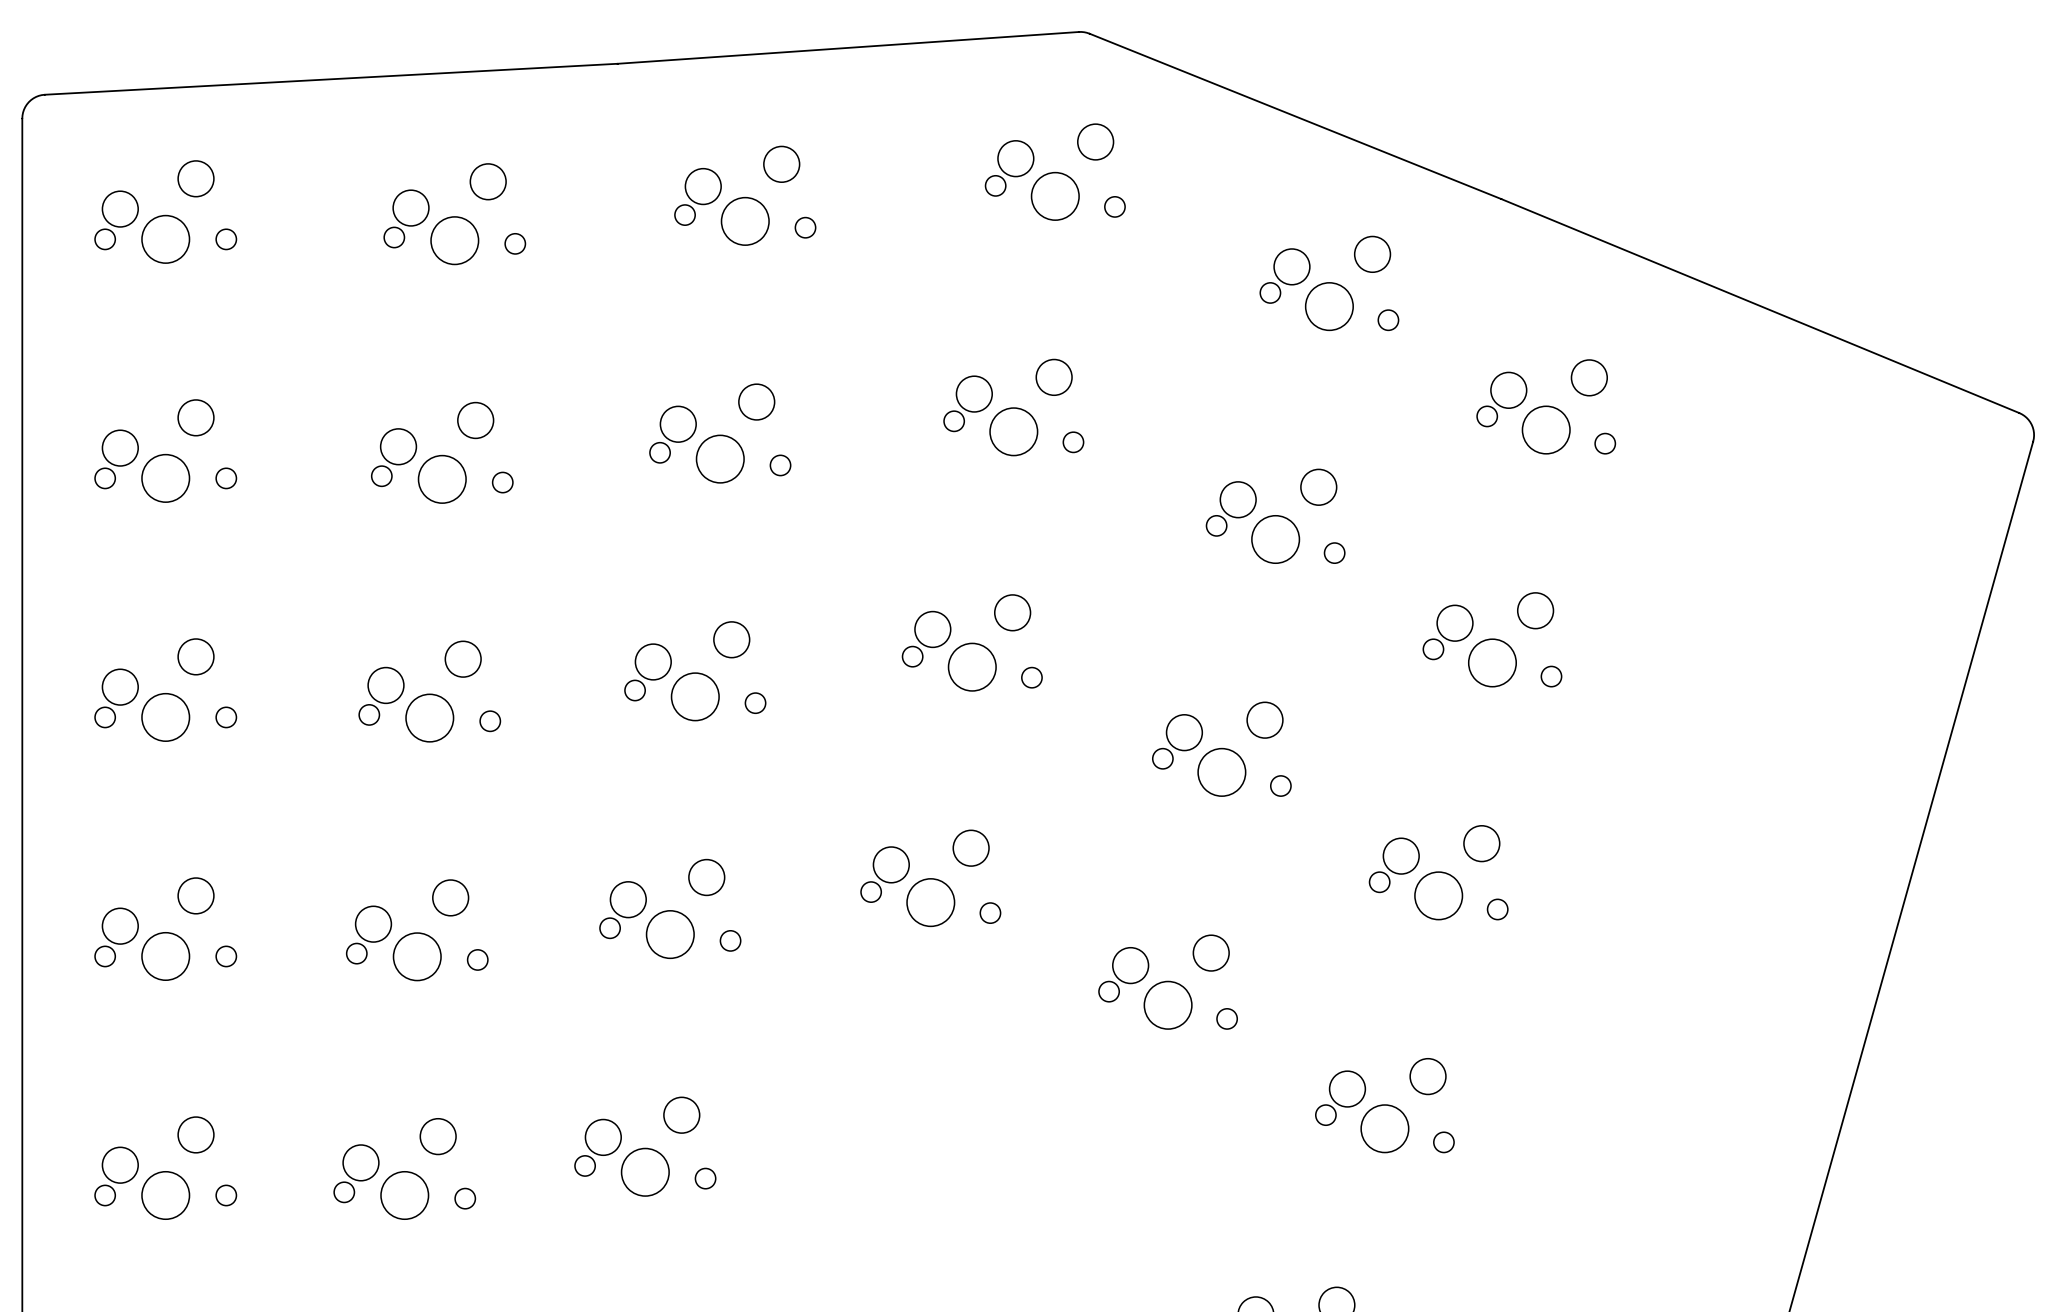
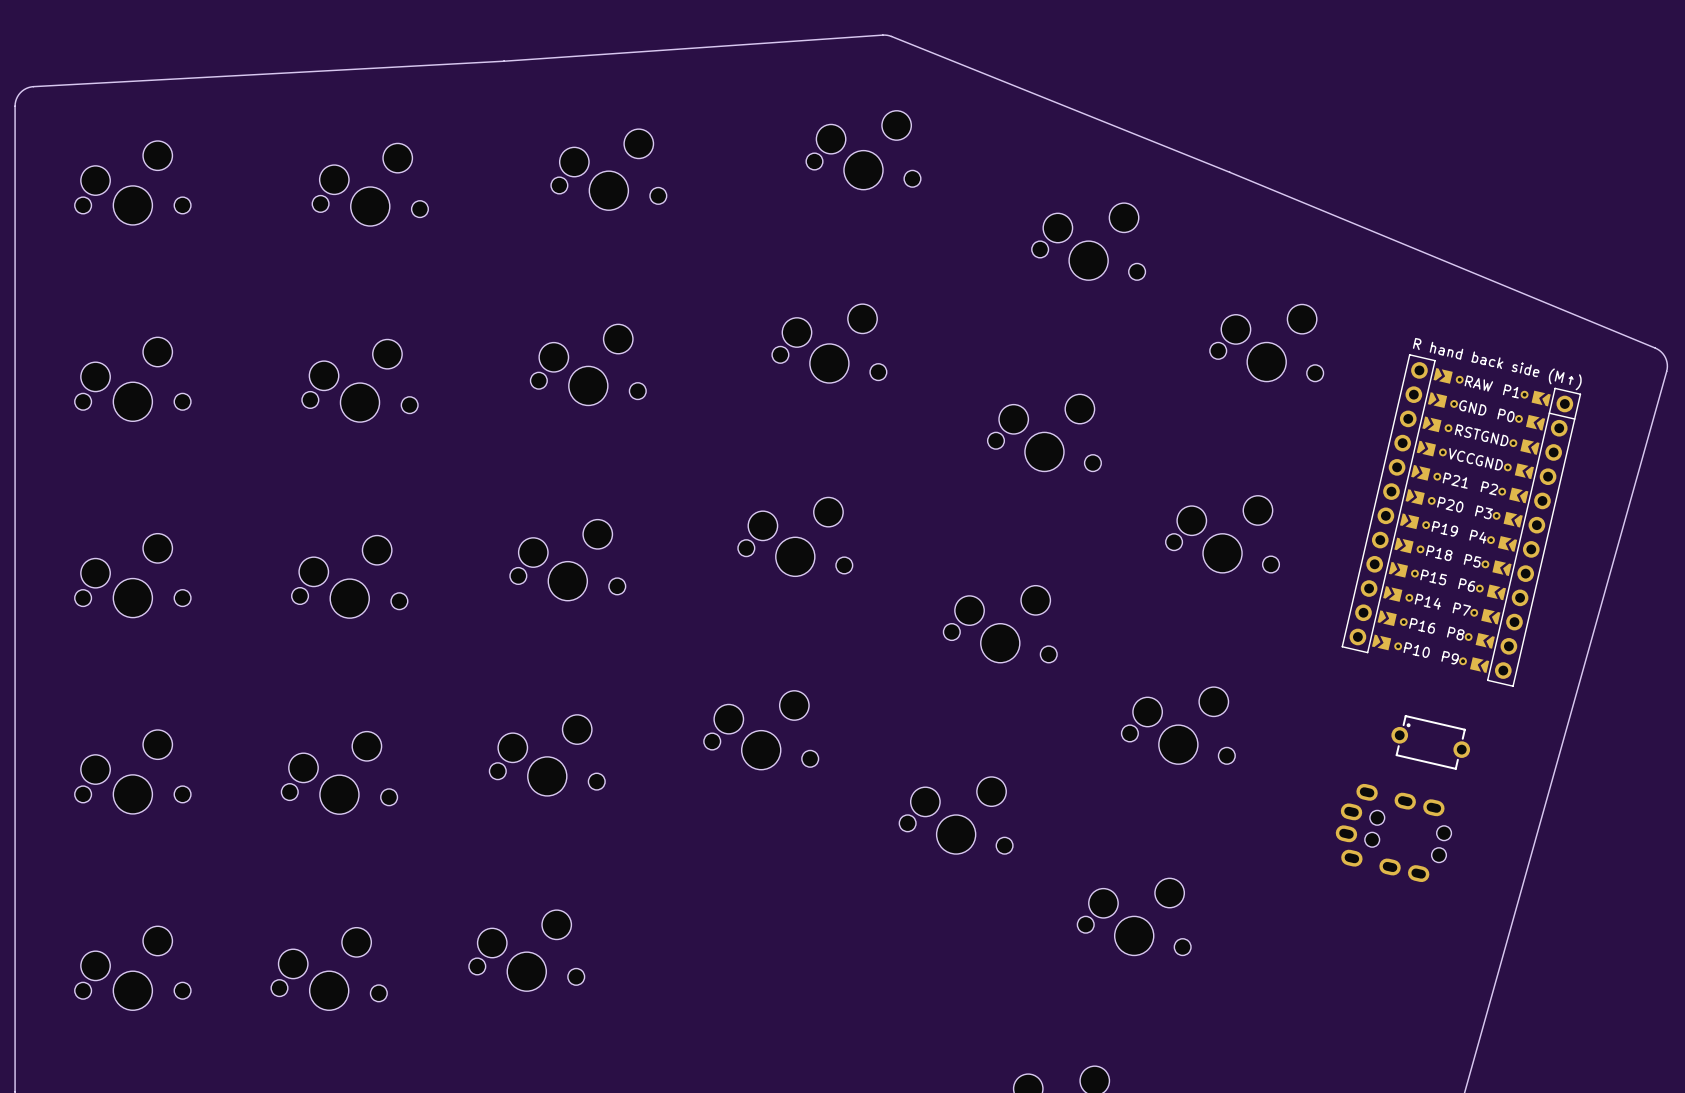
part: none -> (1461, 520)
part: none -> (1430, 742)
part: none -> (1393, 832)

